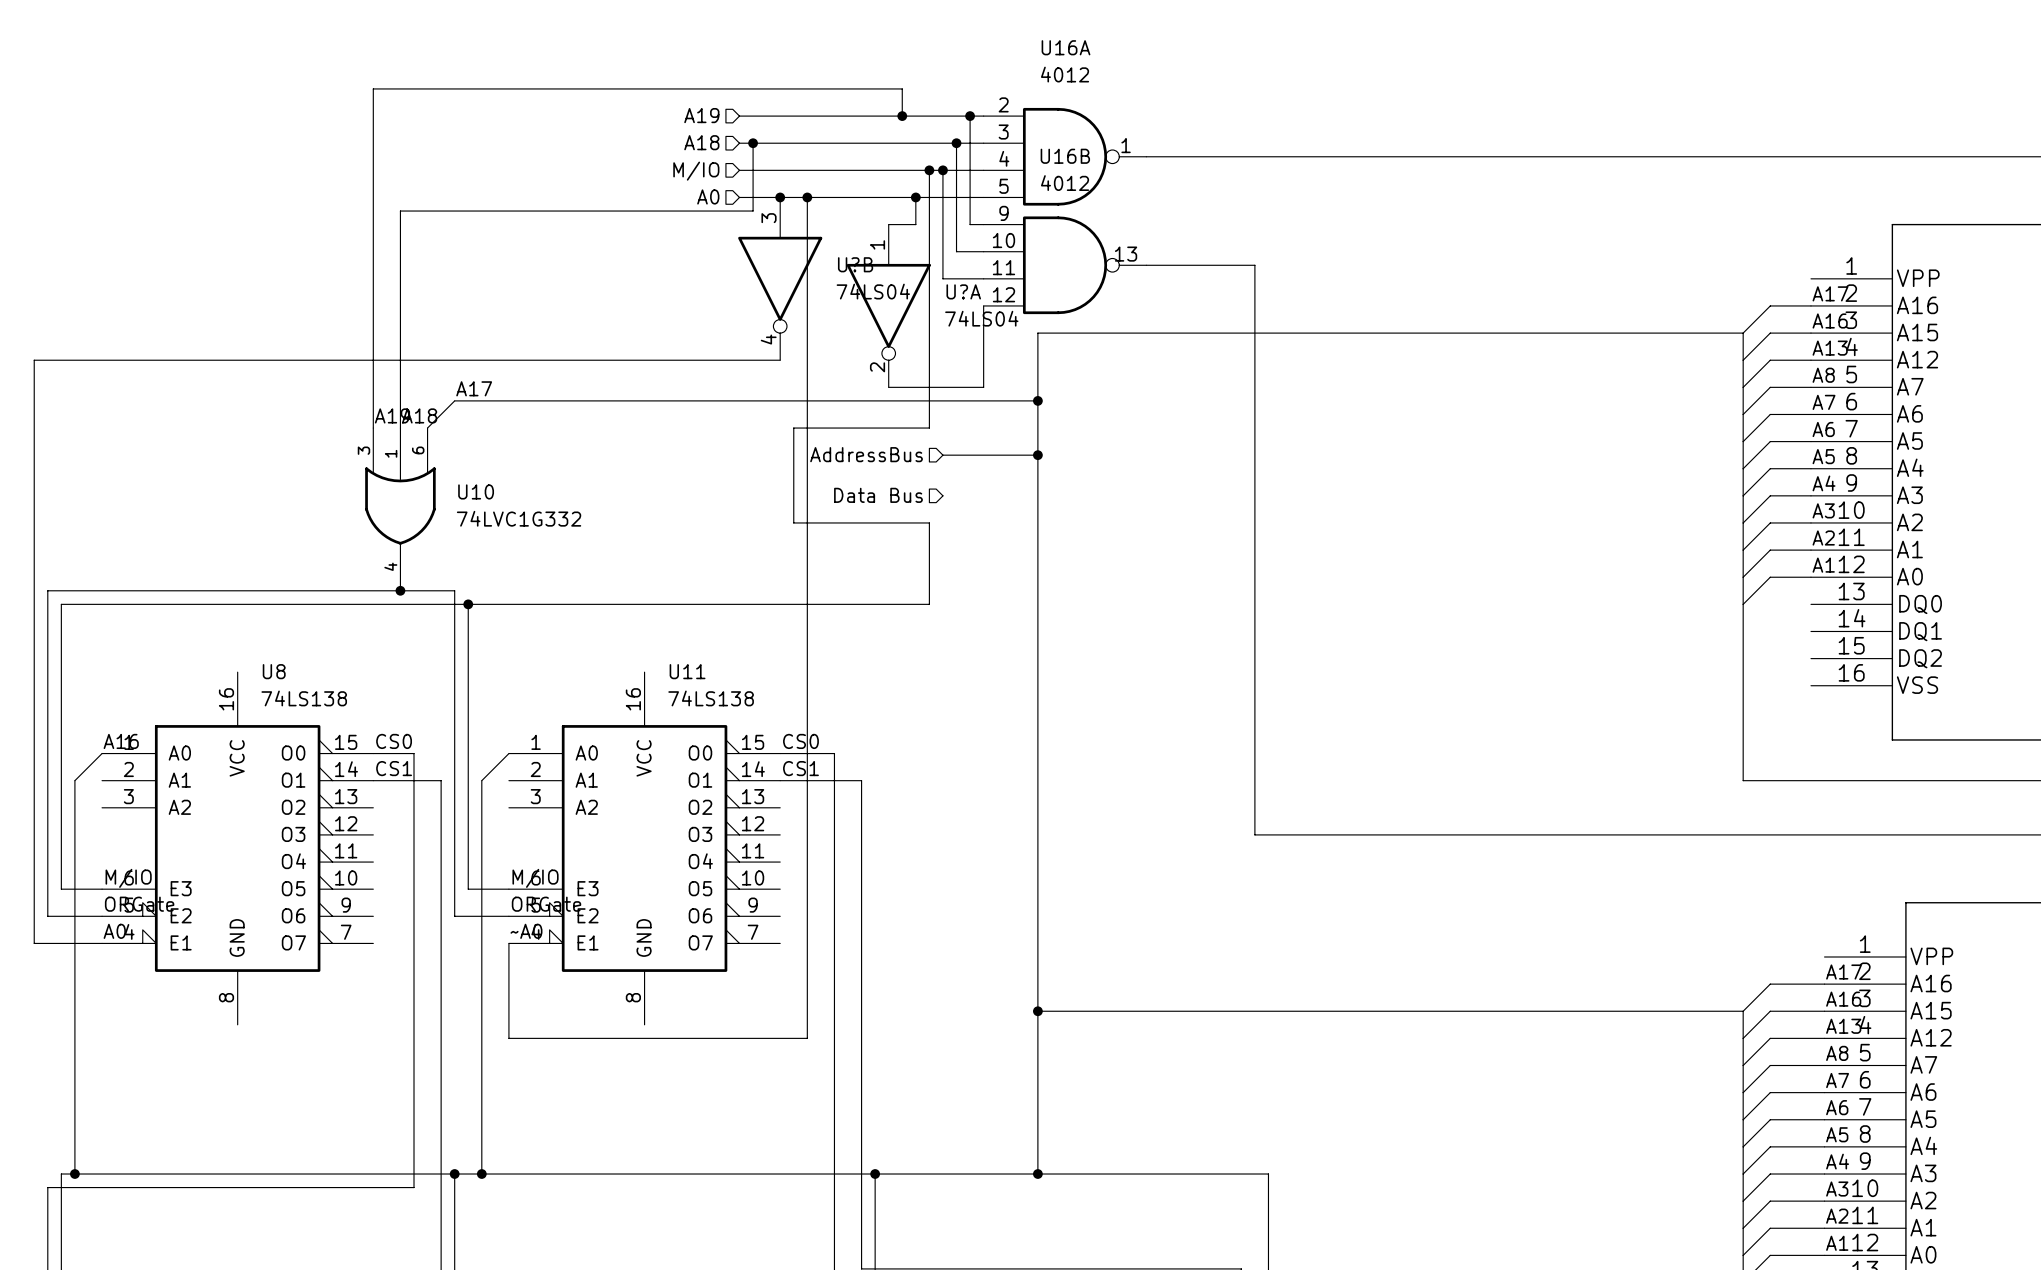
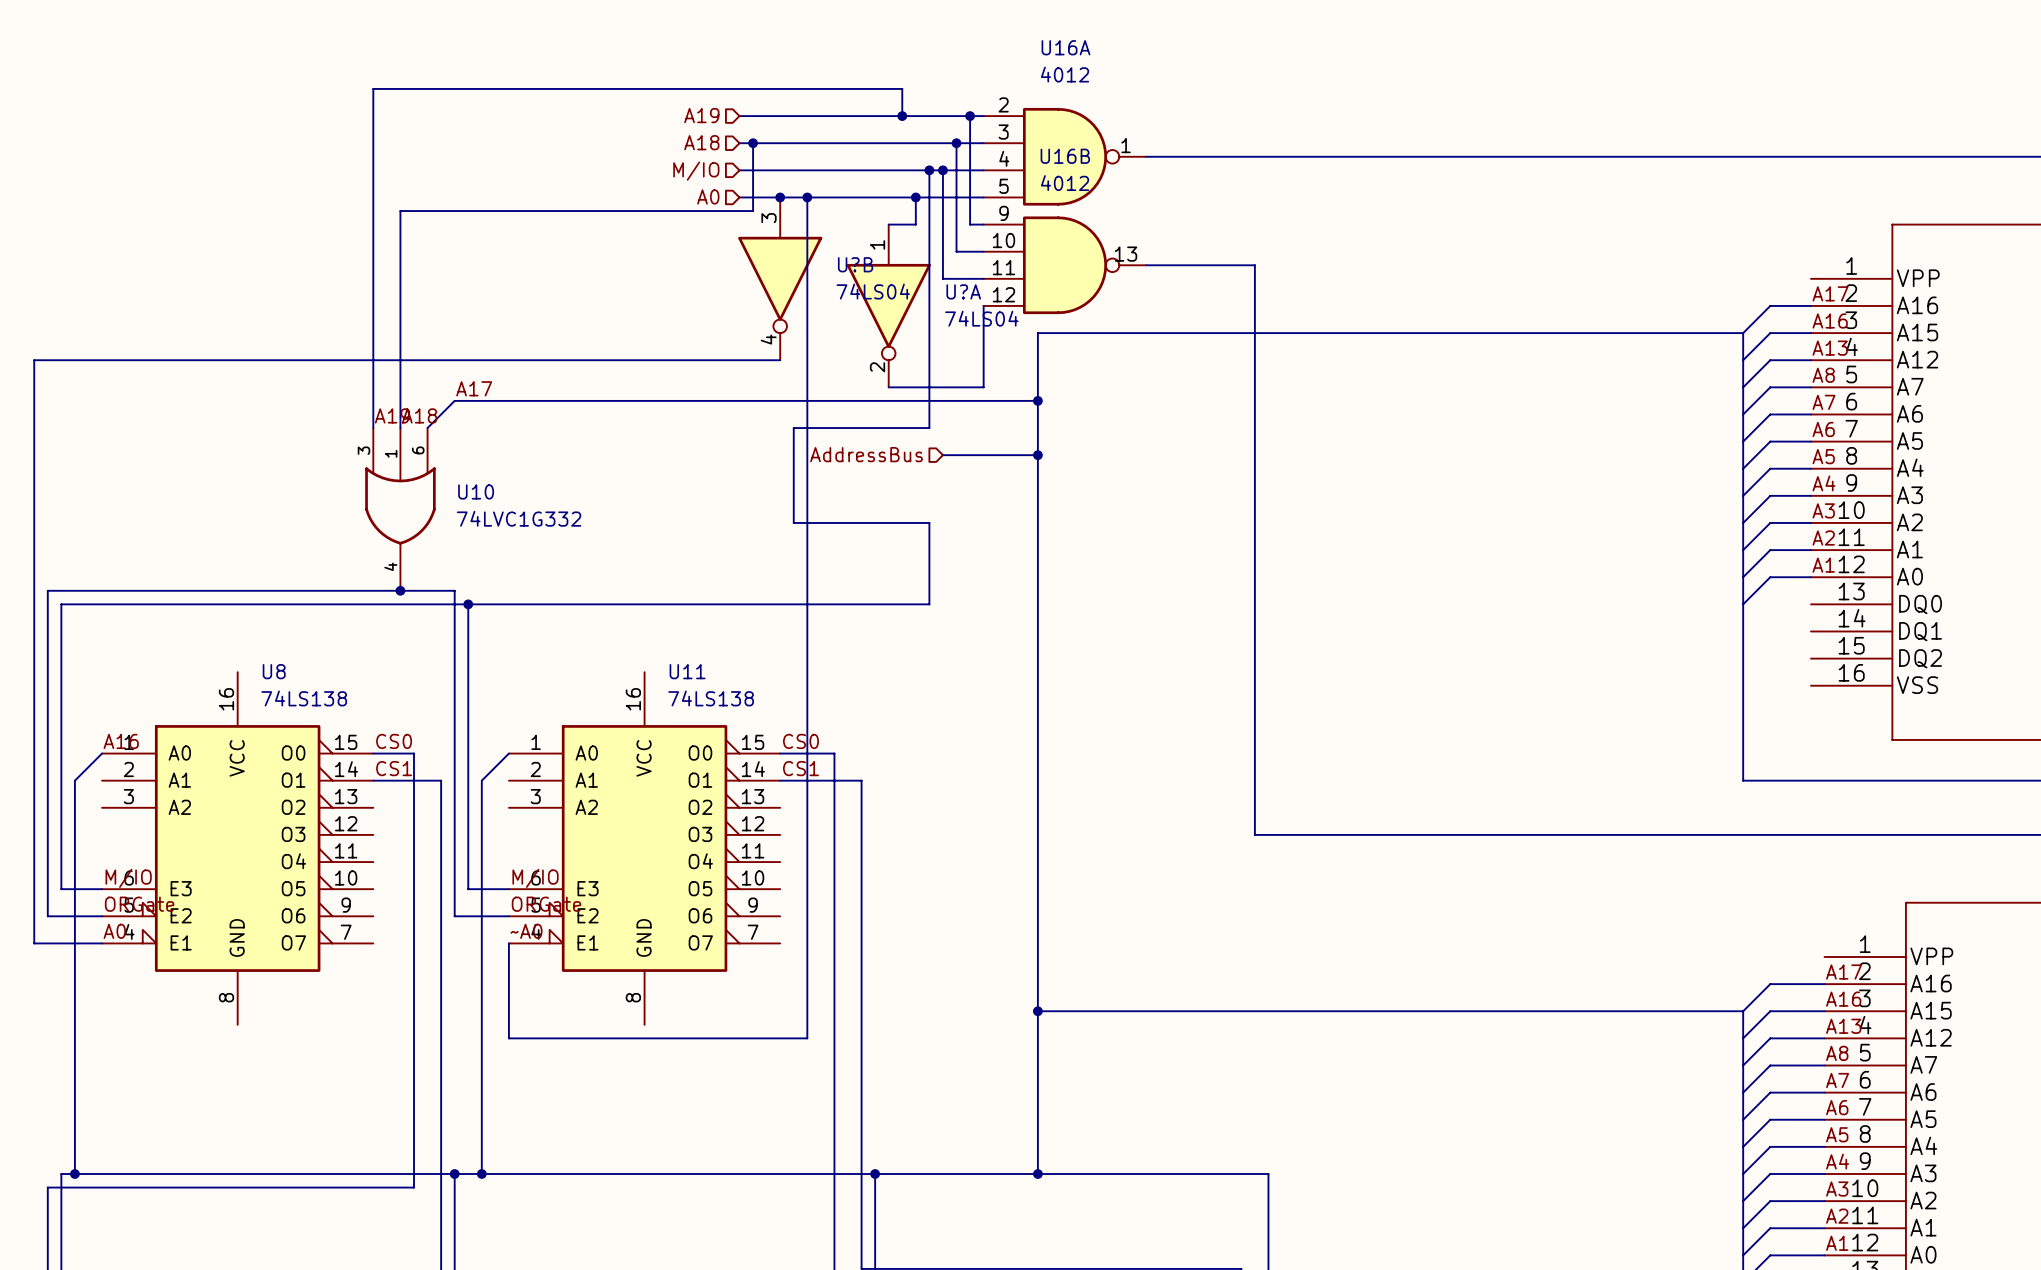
hierarchical label: Data Bus (878, 495) -> none

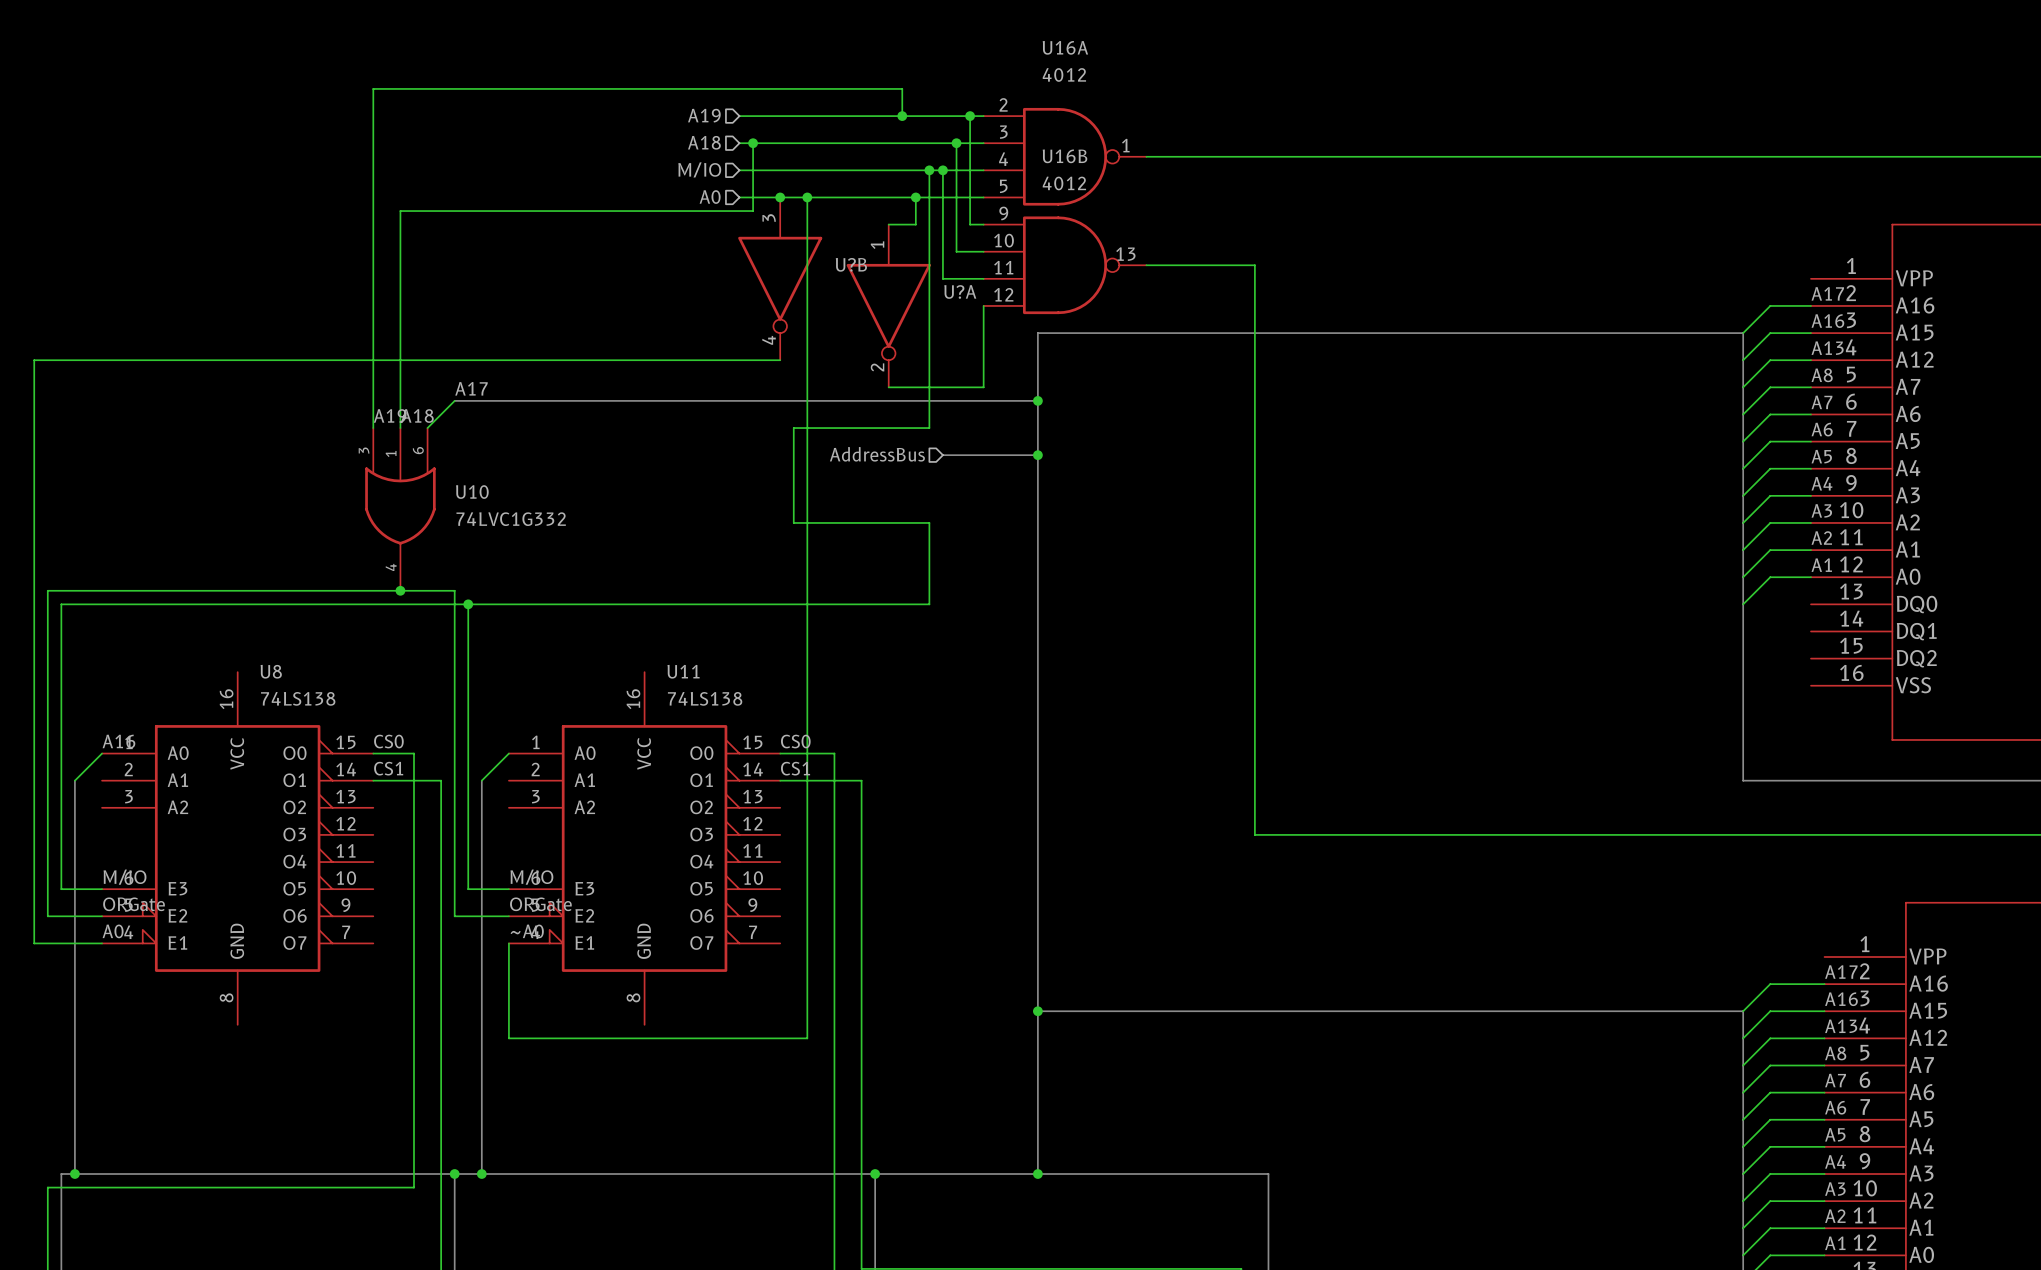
U?B value: 74LS04 (873, 291) -> none
U?A value: 74LS04 (981, 318) -> none

